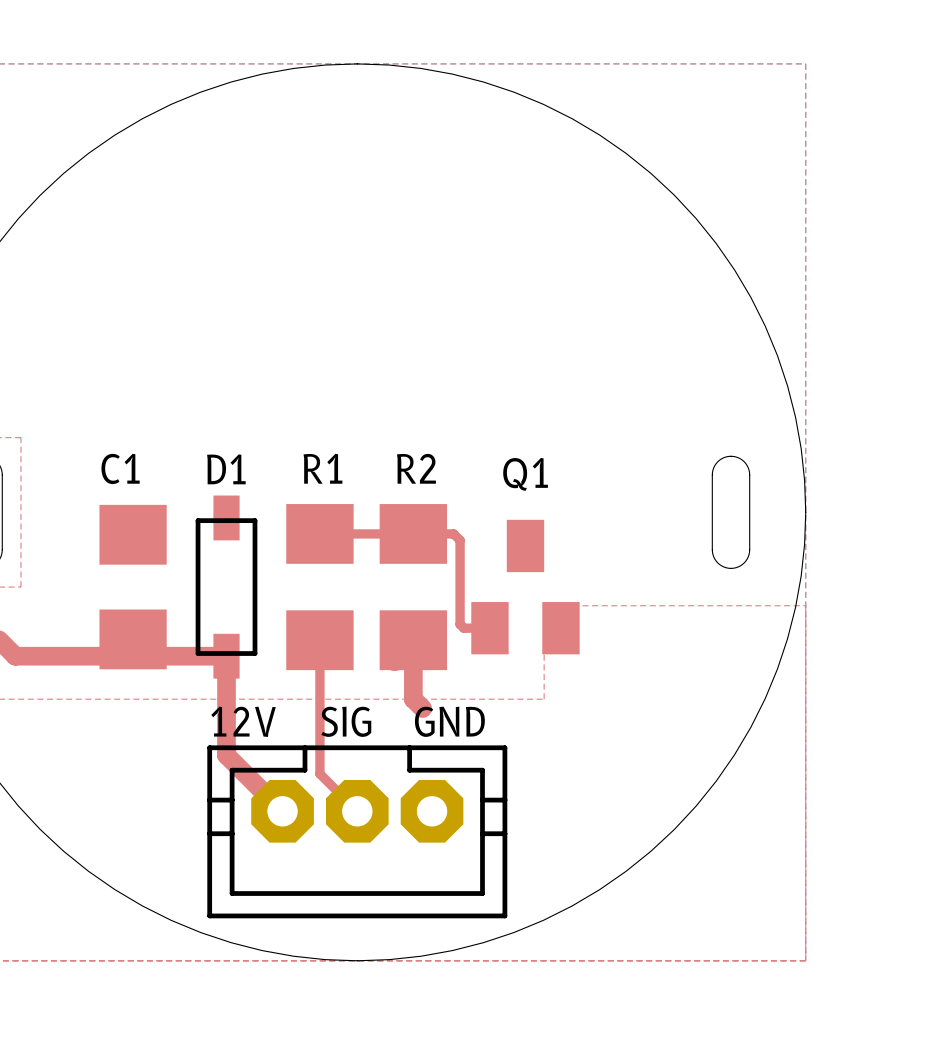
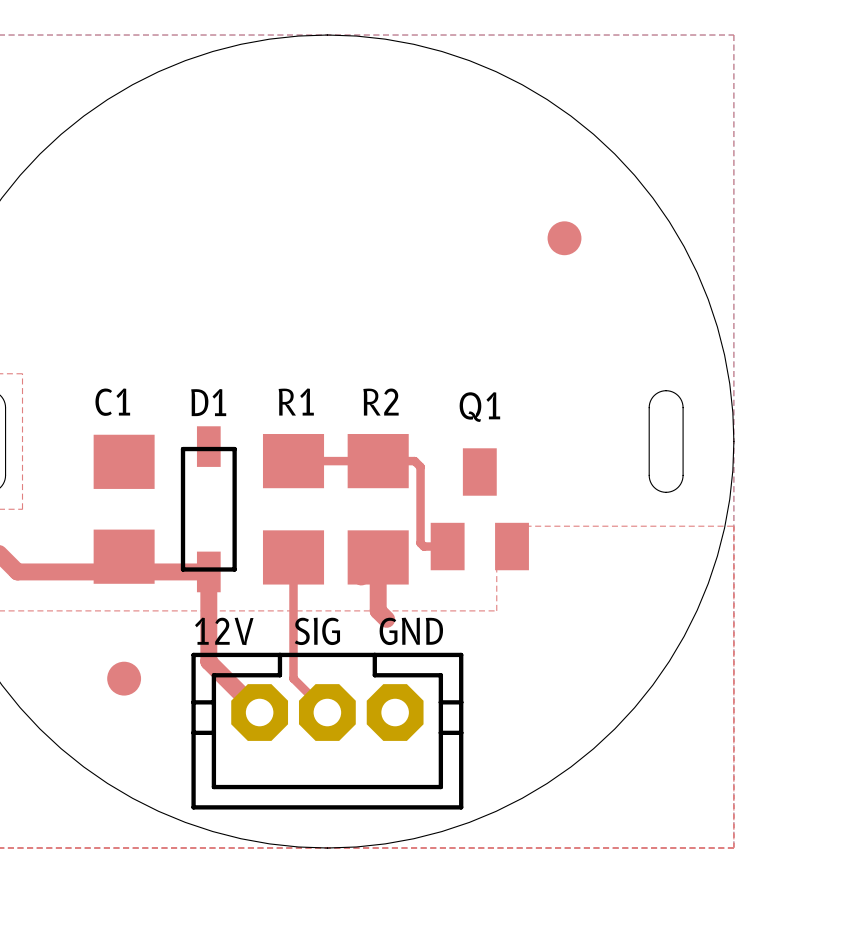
part: none -> (564, 238)
part: none -> (124, 678)

